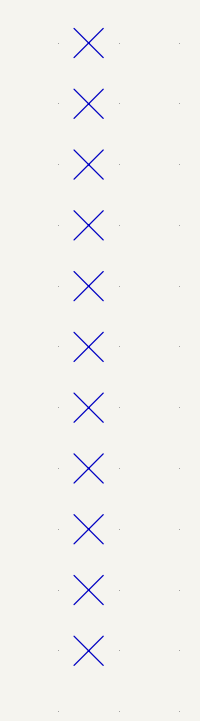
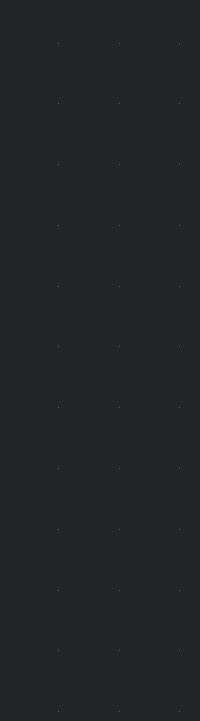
no-connect mark: (88, 43) -> none
no-connect mark: (88, 103) -> none
no-connect mark: (88, 164) -> none
no-connect mark: (88, 225) -> none
no-connect mark: (88, 286) -> none
no-connect mark: (88, 346) -> none
no-connect mark: (88, 407) -> none
no-connect mark: (88, 468) -> none
no-connect mark: (88, 529) -> none
no-connect mark: (88, 590) -> none
no-connect mark: (88, 650) -> none

